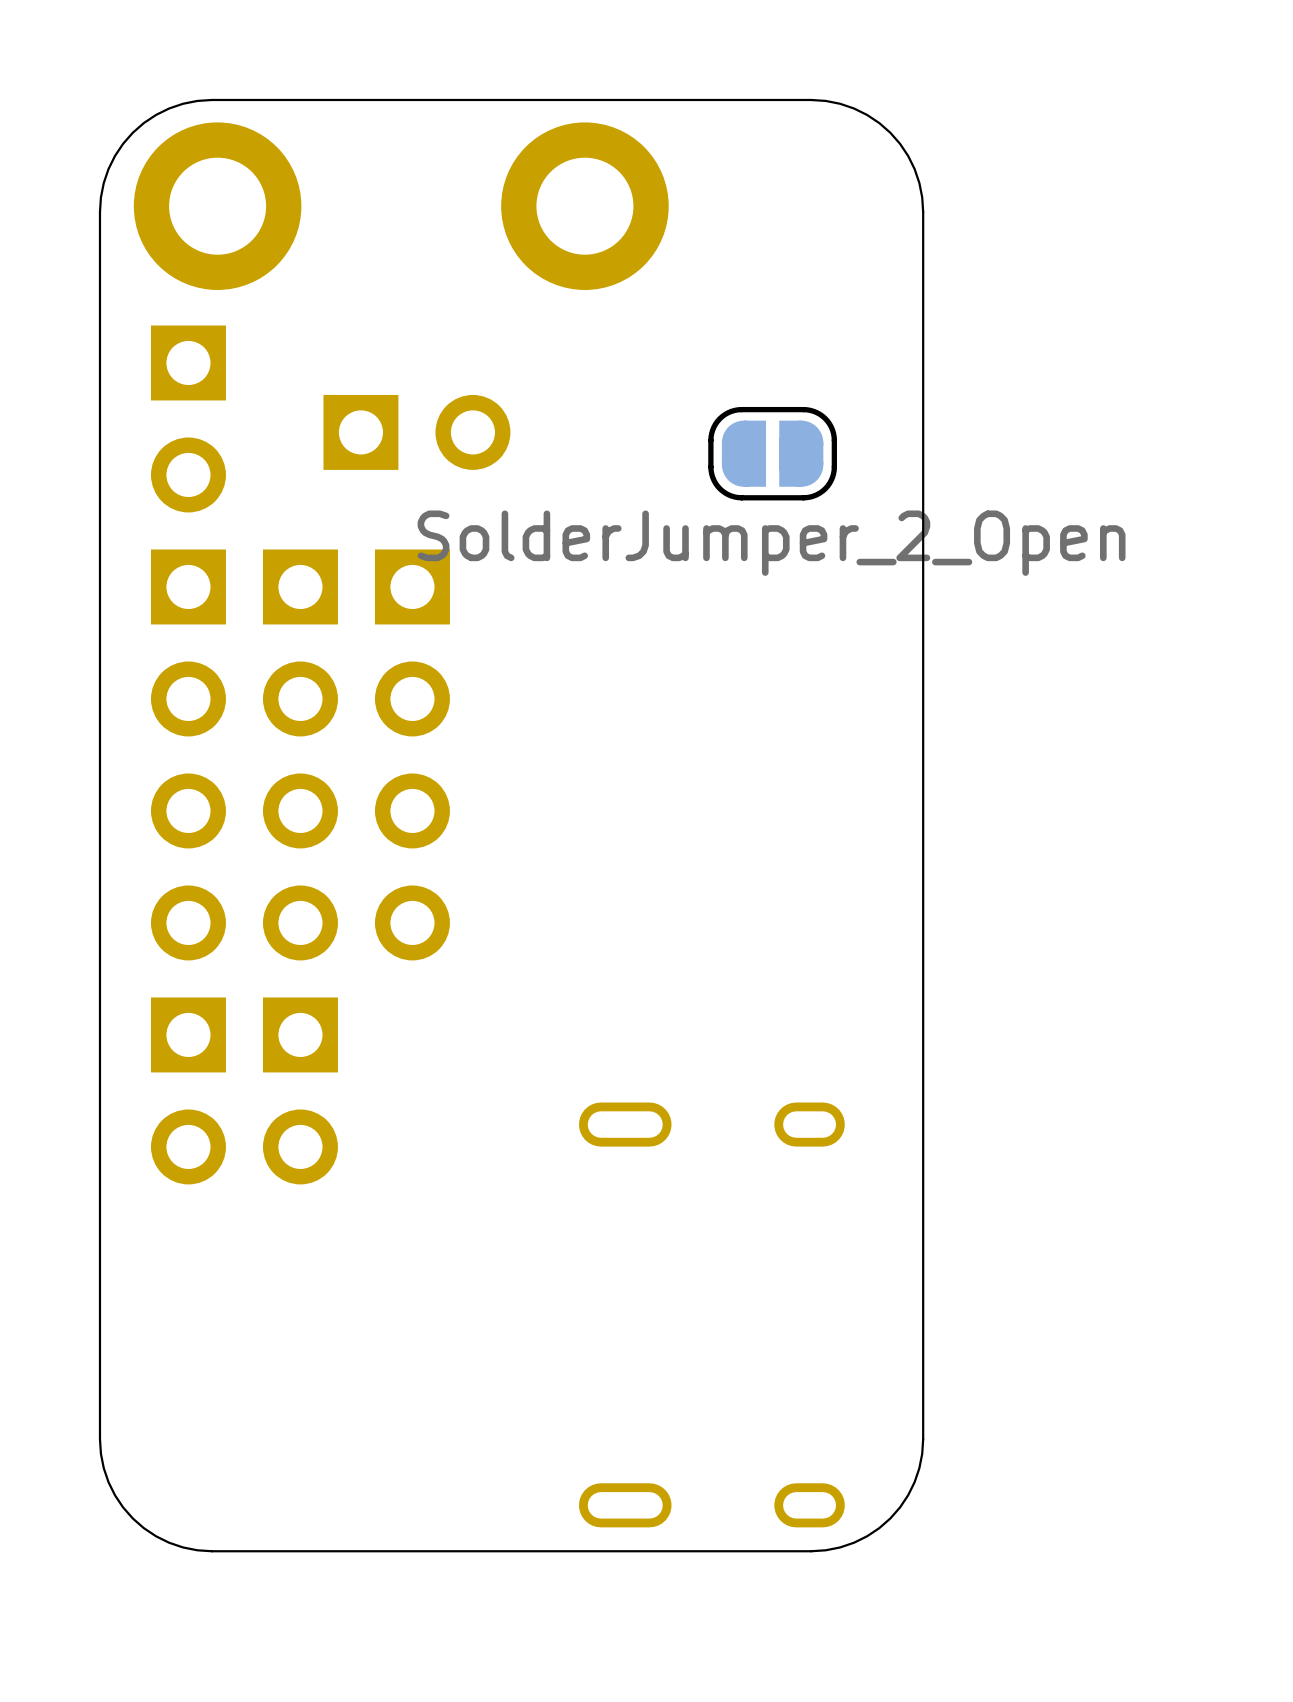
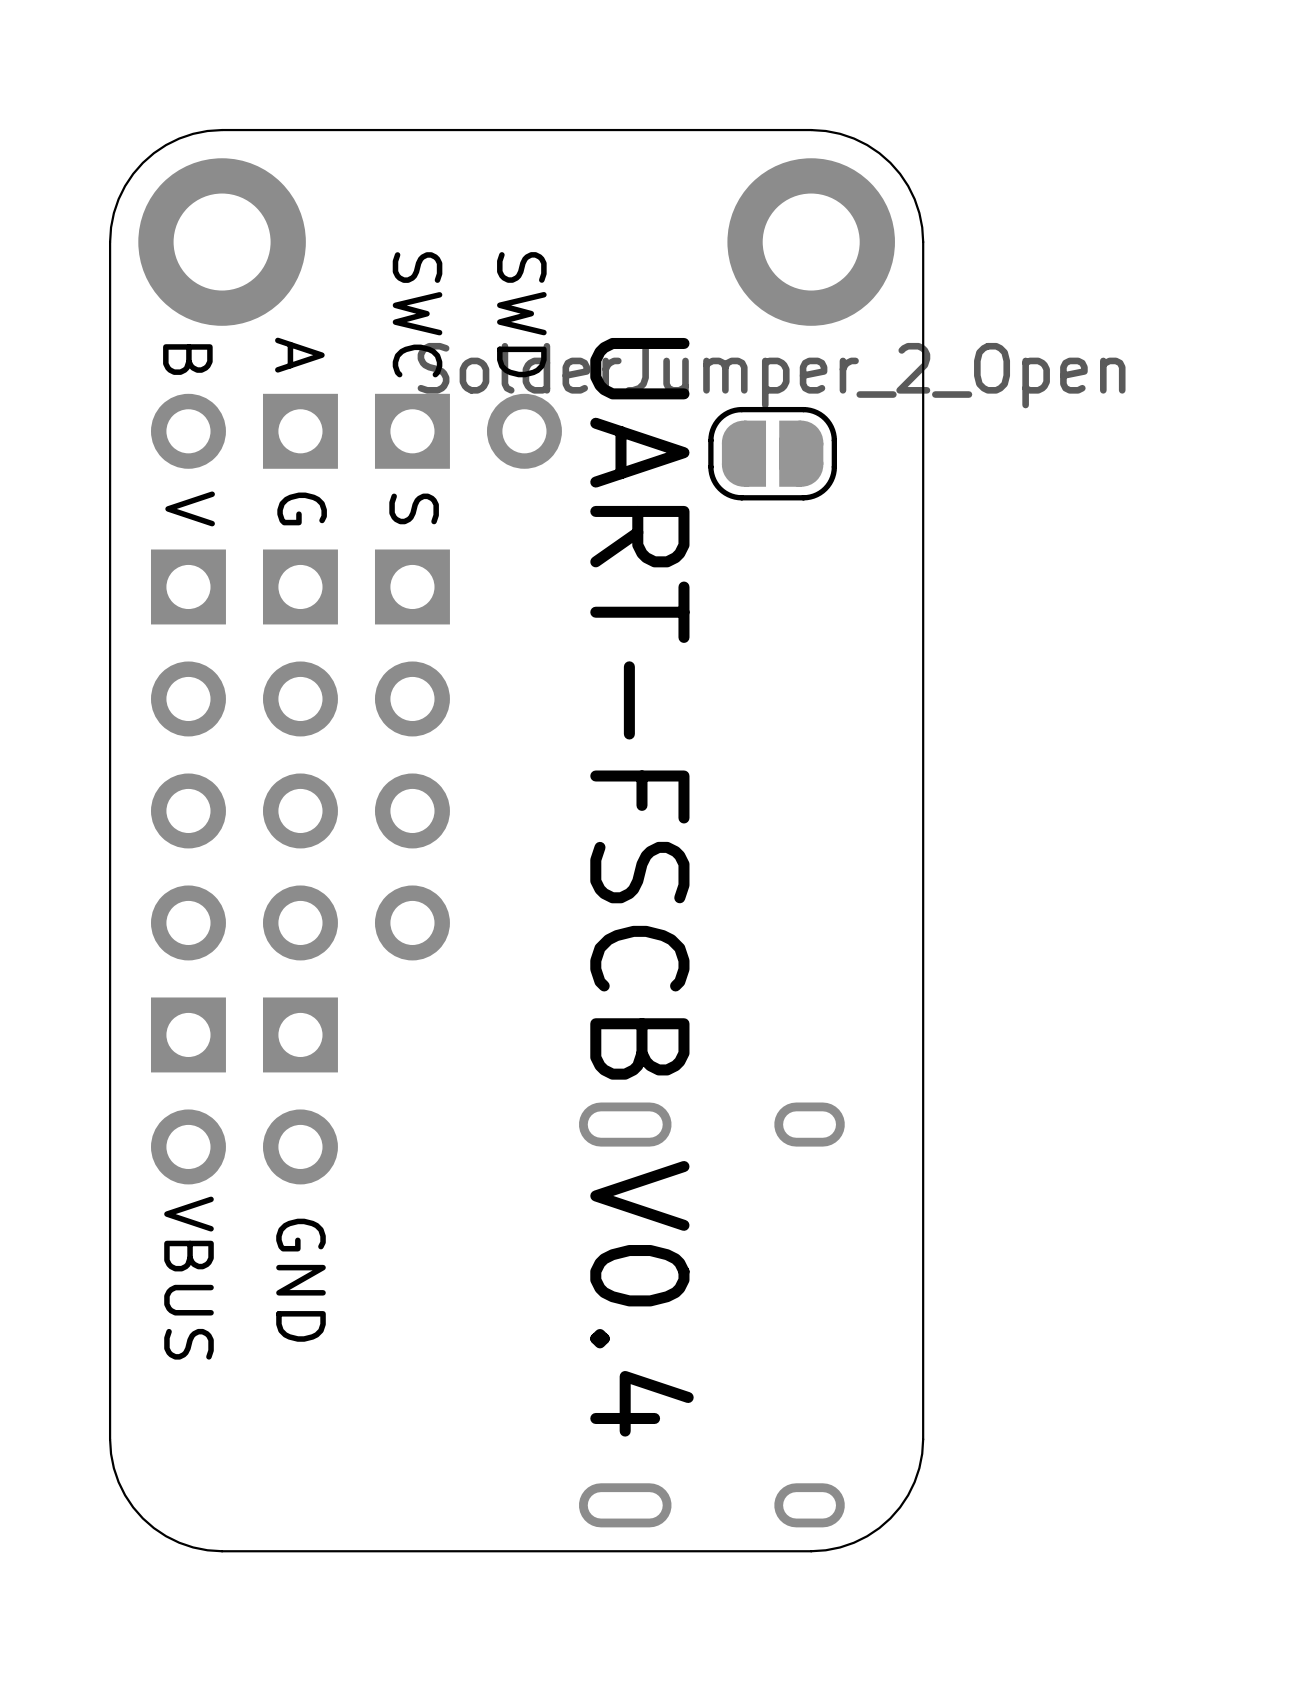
part position: (217, 206) -> (222, 242)
part position: (584, 206) -> (811, 242)
text: none -> SWC (417, 314)
text: none -> SWD (521, 314)
text: none -> A (299, 355)
text: none -> B (187, 359)
part rotation: 0° (188, 418) -> 90° clockwise (244, 431)
part position: (416, 432) -> (468, 431)
text: none -> V (190, 508)
text: none -> G (302, 508)
text: none -> S (414, 508)
part value position: SolderJumper_2_Open (771, 543) -> SolderJumper_2_Open (771, 375)
text: none -> UART-FSCB V0.4 (641, 887)
text: none -> VBUS (189, 1278)
text: none -> GND (300, 1280)
board edge: (923, 1439) (923, 211) (919, 182) (908, 155) (900, 143) (879, 123) (854, 108) (825, 100) (197, 100) (169, 108) (155, 114) (132, 132) (123, 143) (108, 169) (100, 197) (99, 1439) (100, 1453) (108, 1482) (114, 1495) (132, 1518) (155, 1536) (169, 1542) (197, 1550) (222, 1551) -> (923, 1439) (923, 242) (919, 213) (908, 186) (890, 162) (867, 145) (840, 133) (825, 131) (207, 131) (179, 138) (153, 153) (142, 162) (125, 186) (113, 213) (111, 227) (110, 1439) (111, 1453) (118, 1482) (133, 1507) (142, 1518) (153, 1528) (179, 1542) (193, 1547) (222, 1551)

